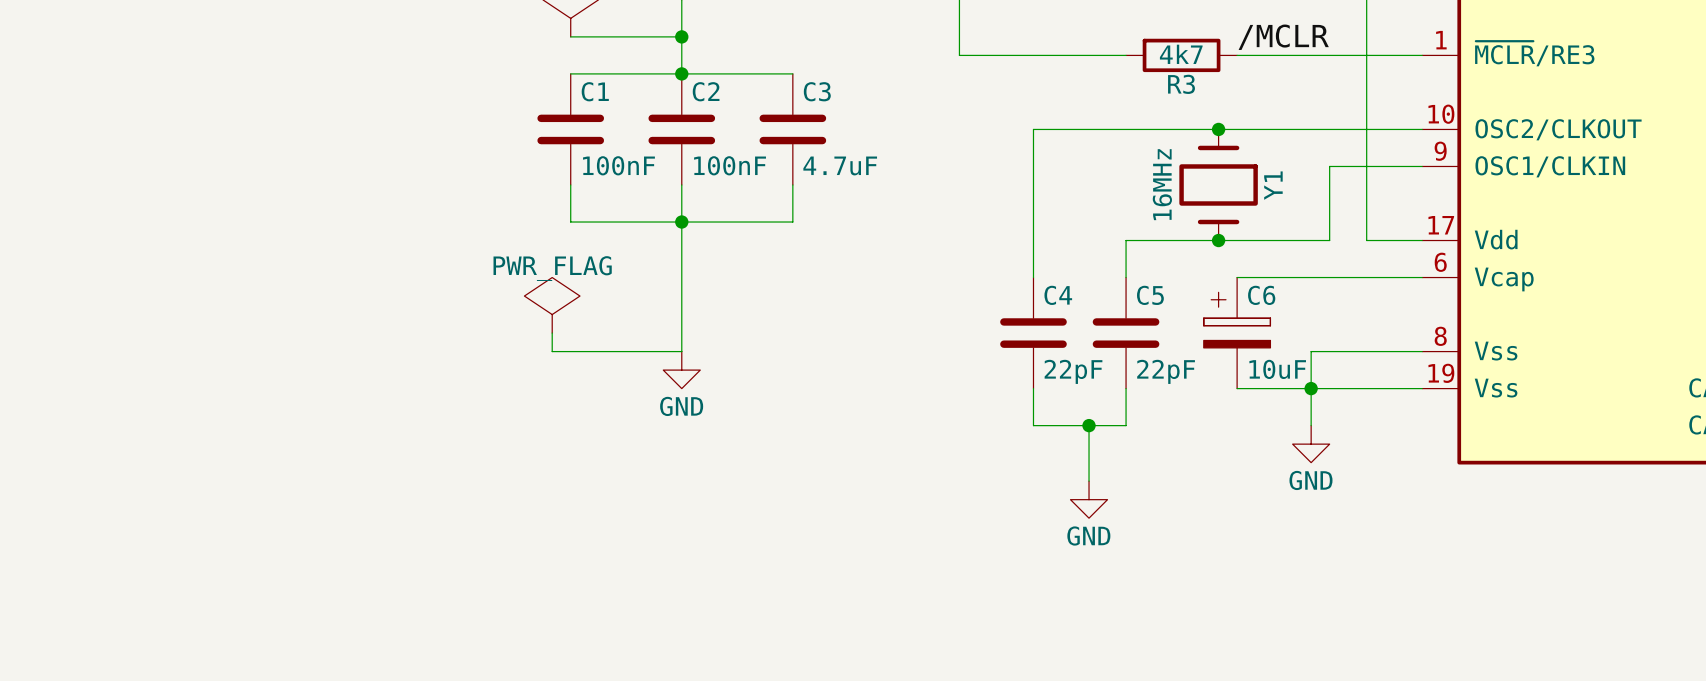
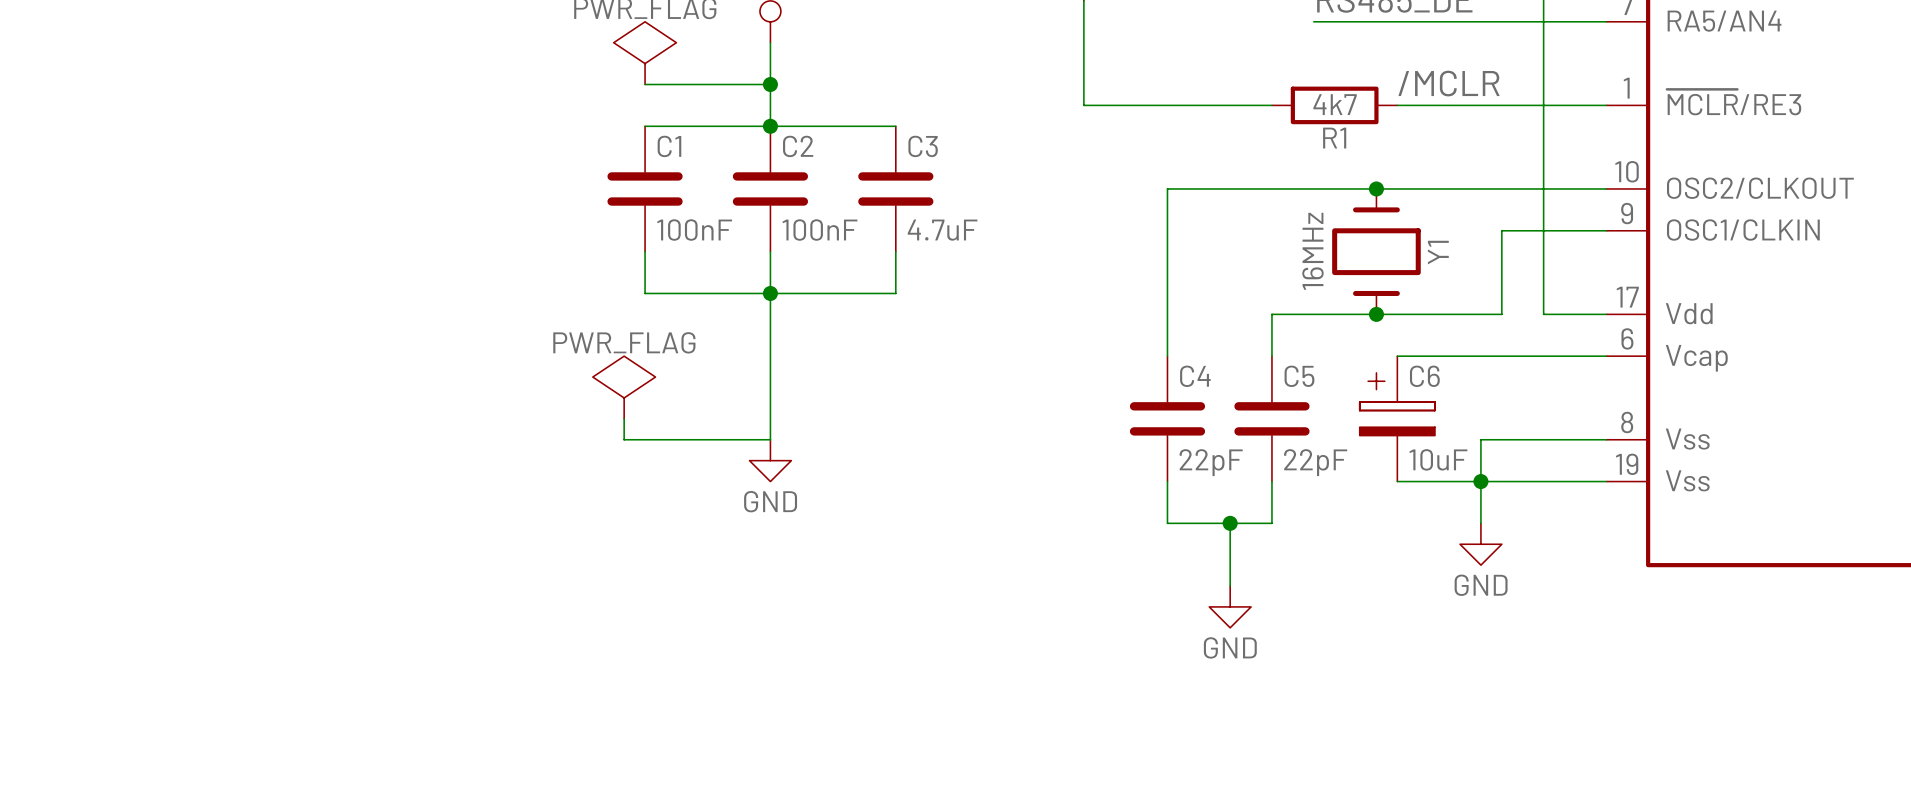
R3 name: R3 (1181, 84) -> R1 (1334, 138)

